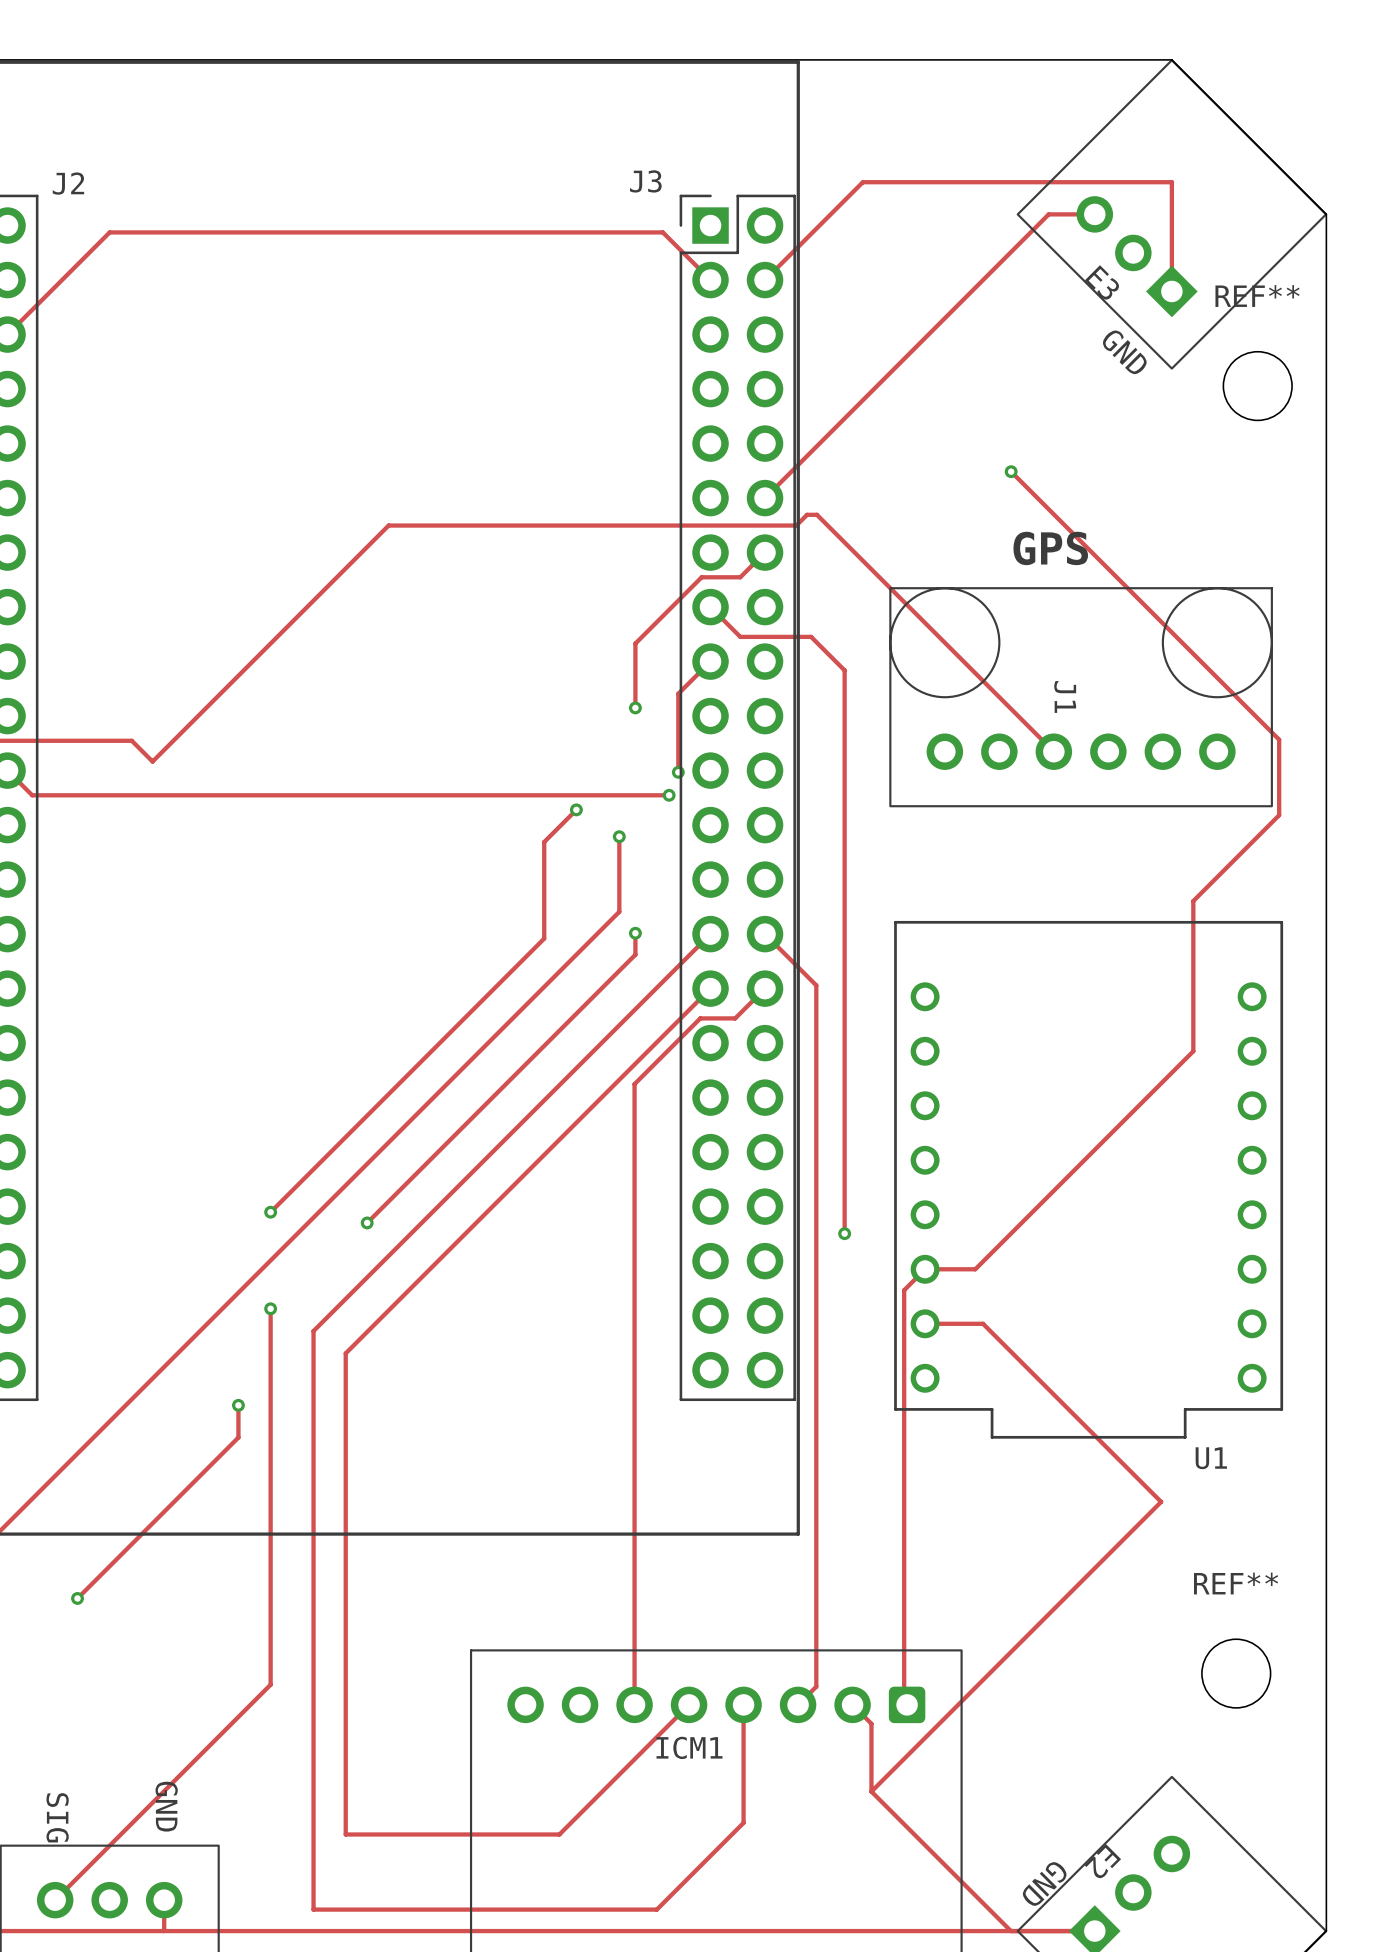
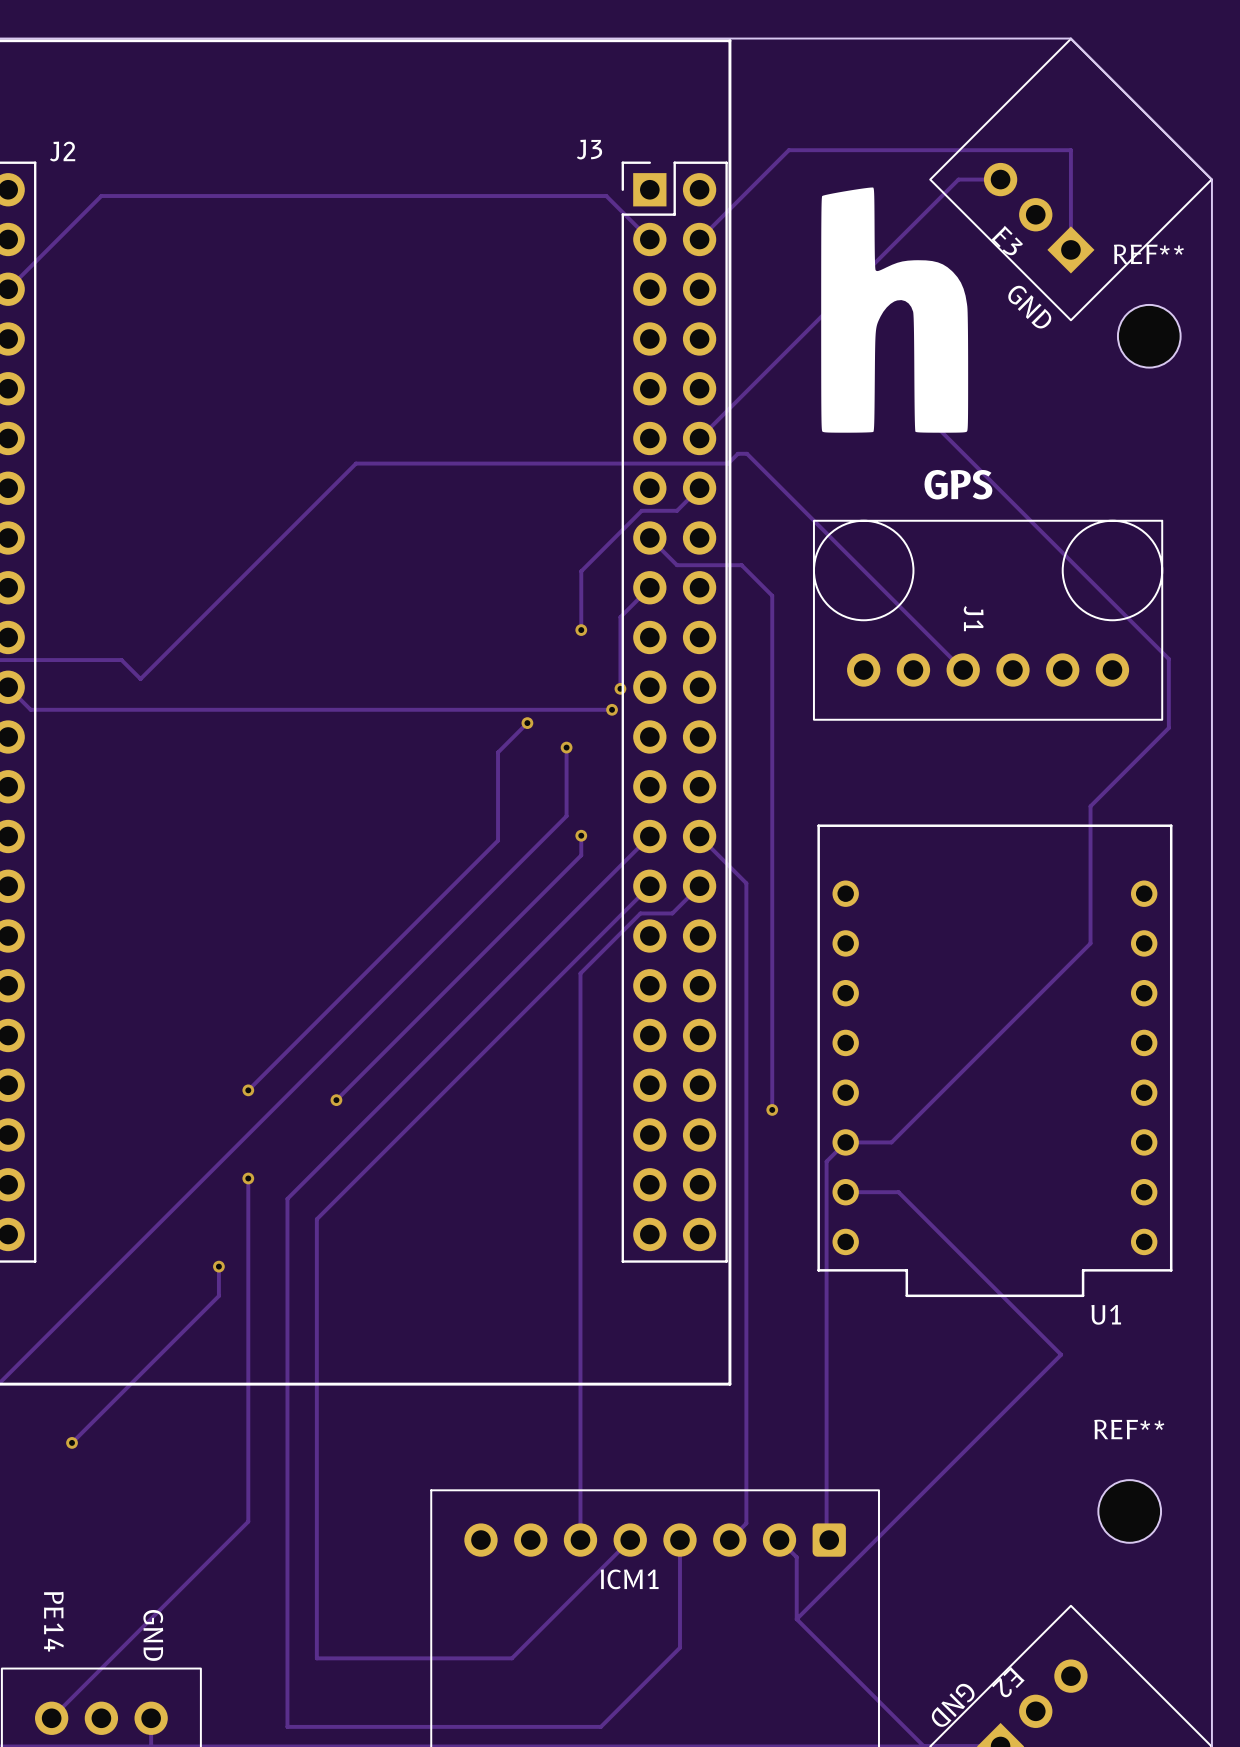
drawing: none -> [821, 187, 969, 433]
part text: none -> PE14 (53, 1621)
part text: SIG (57, 1817) -> none

